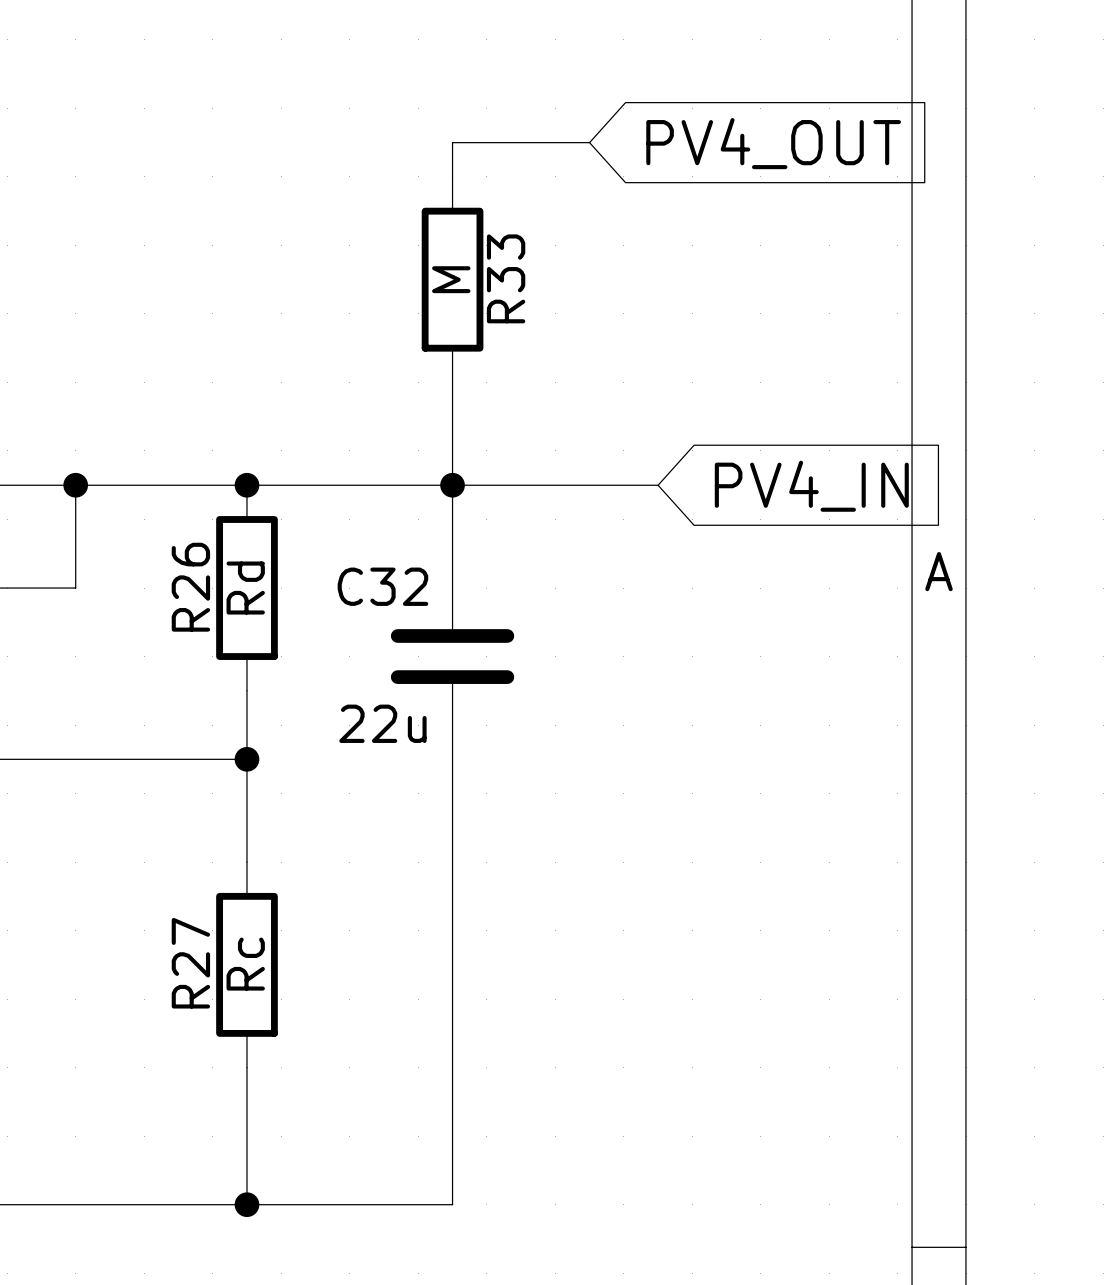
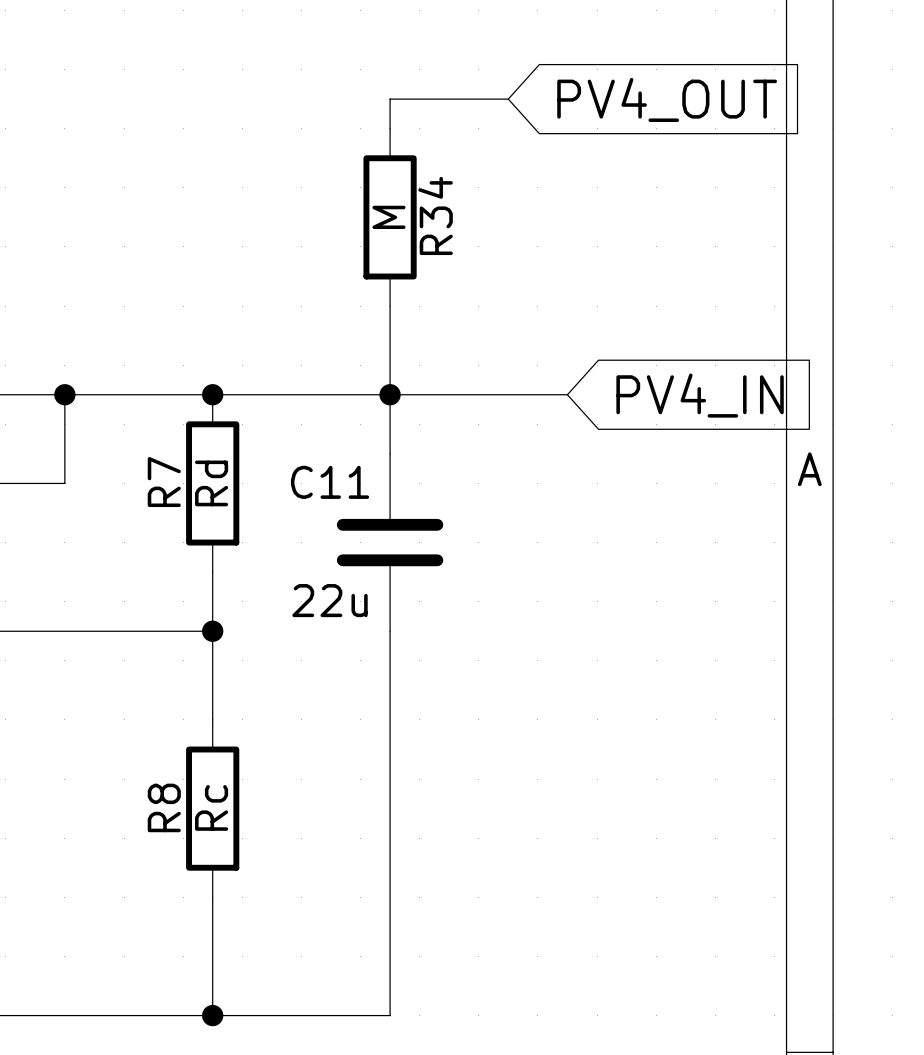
R33 name: R33 (506, 278) -> R34 (435, 215)
C32 name: C32 (382, 586) -> C11 (330, 482)
R26 name: R26 (190, 587) -> R7 (164, 482)
R27 name: R27 (190, 963) -> R8 (164, 807)

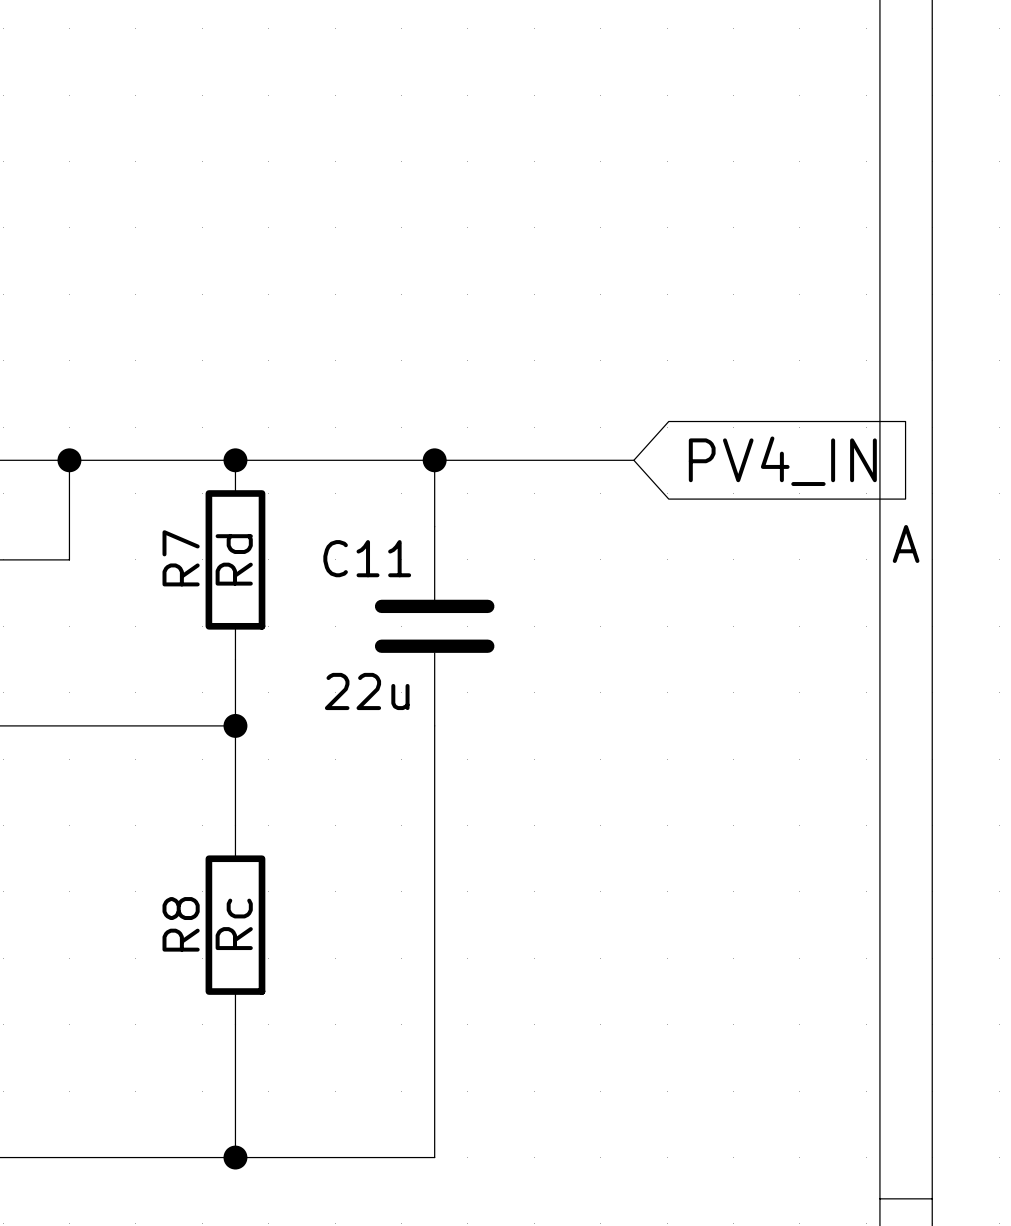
wire: (508, 99) (390, 99) (390, 128) -> none
global label: PV4_OUT (667, 99) -> none
R34: M (390, 217) -> none
wire: (390, 306) (390, 394) -> none

